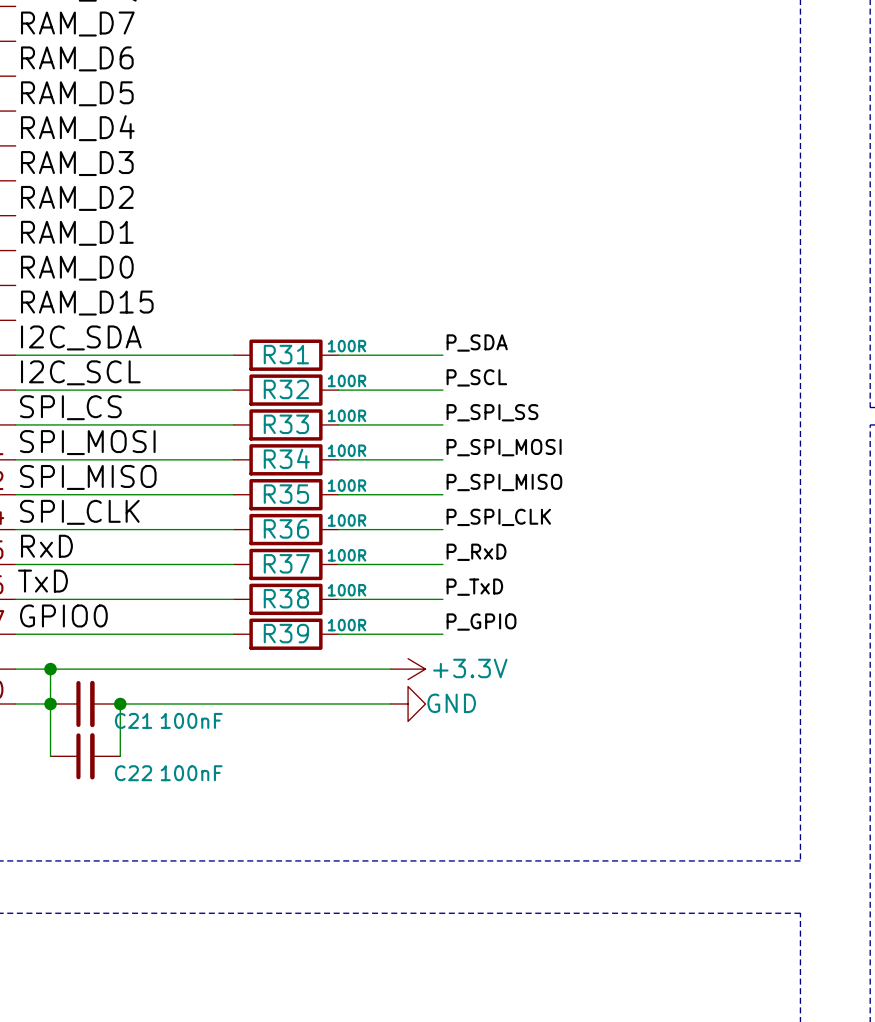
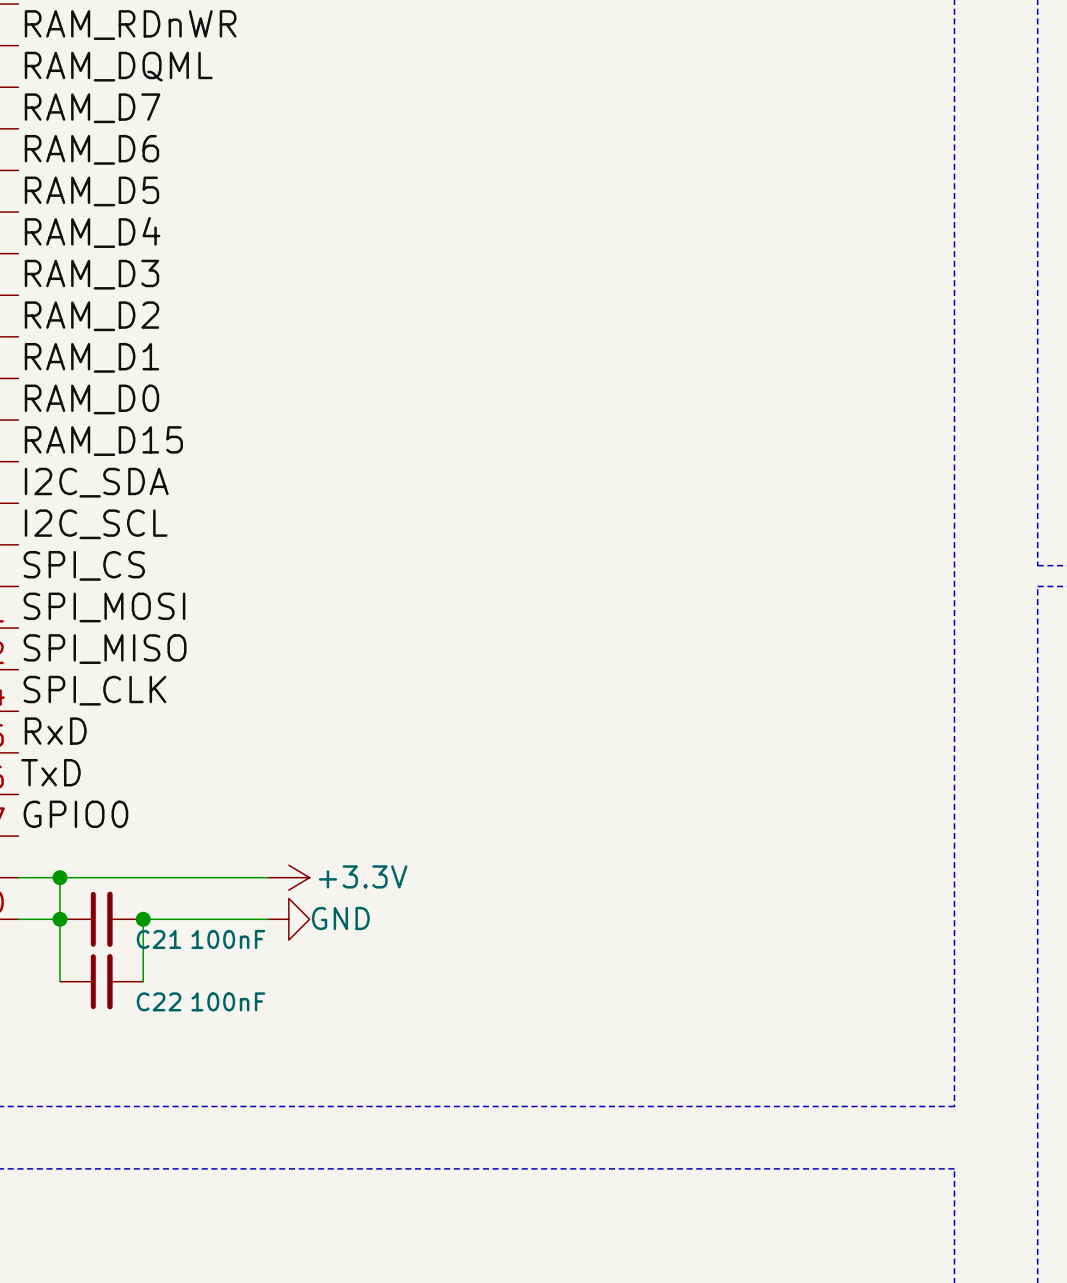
label: P_SDA (477, 343) -> none
wire: (15, 355) (233, 355) -> none
R31: 100R (285, 355) -> none
wire: (338, 355) (442, 355) -> none
label: P_SCL (476, 377) -> none
wire: (15, 390) (233, 390) -> none
R32: 100R (285, 390) -> none
wire: (338, 390) (442, 390) -> none
label: P_SPI_SS (492, 412) -> none
wire: (15, 424) (233, 424) -> none
R33: 100R (285, 424) -> none
wire: (338, 424) (442, 424) -> none
label: P_SPI_MOSI (504, 447) -> none
wire: (15, 459) (233, 459) -> none
R34: 100R (285, 459) -> none
wire: (338, 459) (442, 459) -> none
label: P_SPI_MISO (504, 482) -> none
wire: (15, 494) (233, 494) -> none
R35: 100R (285, 494) -> none
wire: (338, 494) (442, 494) -> none
label: P_SPI_CLK (498, 517) -> none
wire: (15, 529) (233, 529) -> none
R36: 100R (285, 529) -> none
wire: (338, 529) (442, 529) -> none
label: P_RxD (476, 552) -> none
wire: (15, 564) (233, 564) -> none
R37: 100R (285, 564) -> none
wire: (338, 564) (442, 564) -> none
label: P_TxD (474, 587) -> none
wire: (15, 599) (233, 599) -> none
R38: 100R (285, 599) -> none
wire: (338, 599) (442, 599) -> none
label: P_GPIO (481, 622) -> none
wire: (15, 634) (233, 634) -> none
R39: 100R (285, 634) -> none
wire: (338, 634) (442, 634) -> none
wire: (224, 669) (390, 669) -> none
power symbol position: +3.3V (408, 669) -> +3.3V (288, 877)
wire: (224, 703) (390, 703) -> none
power symbol position: GND (408, 703) -> GND (288, 919)

